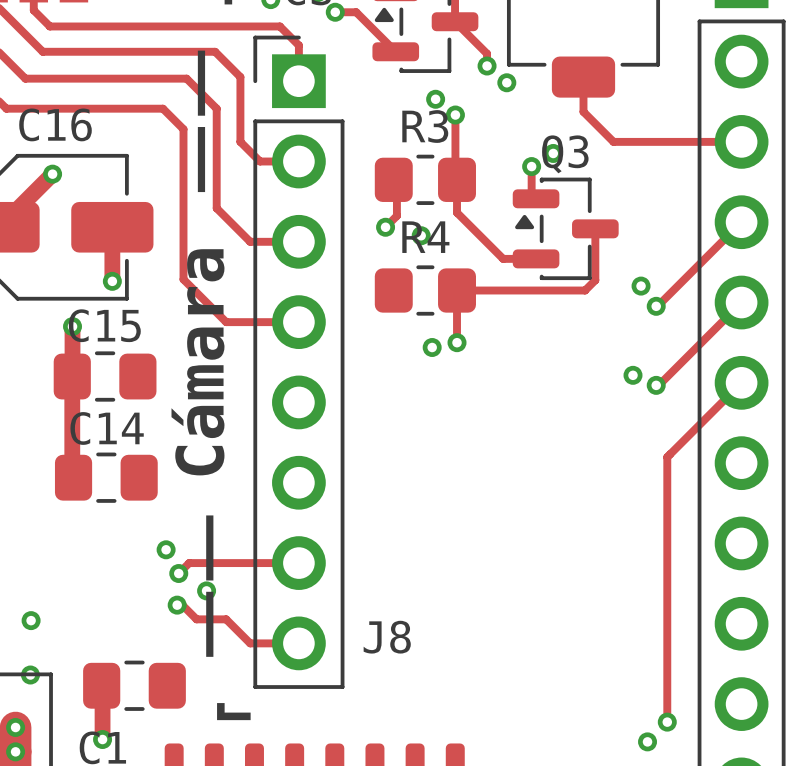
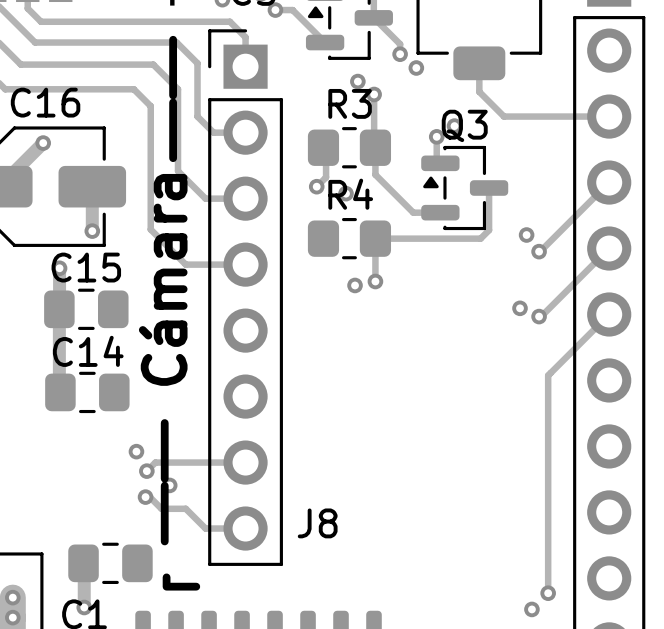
via: (31, 620) -> none
via: (30, 675) -> none

